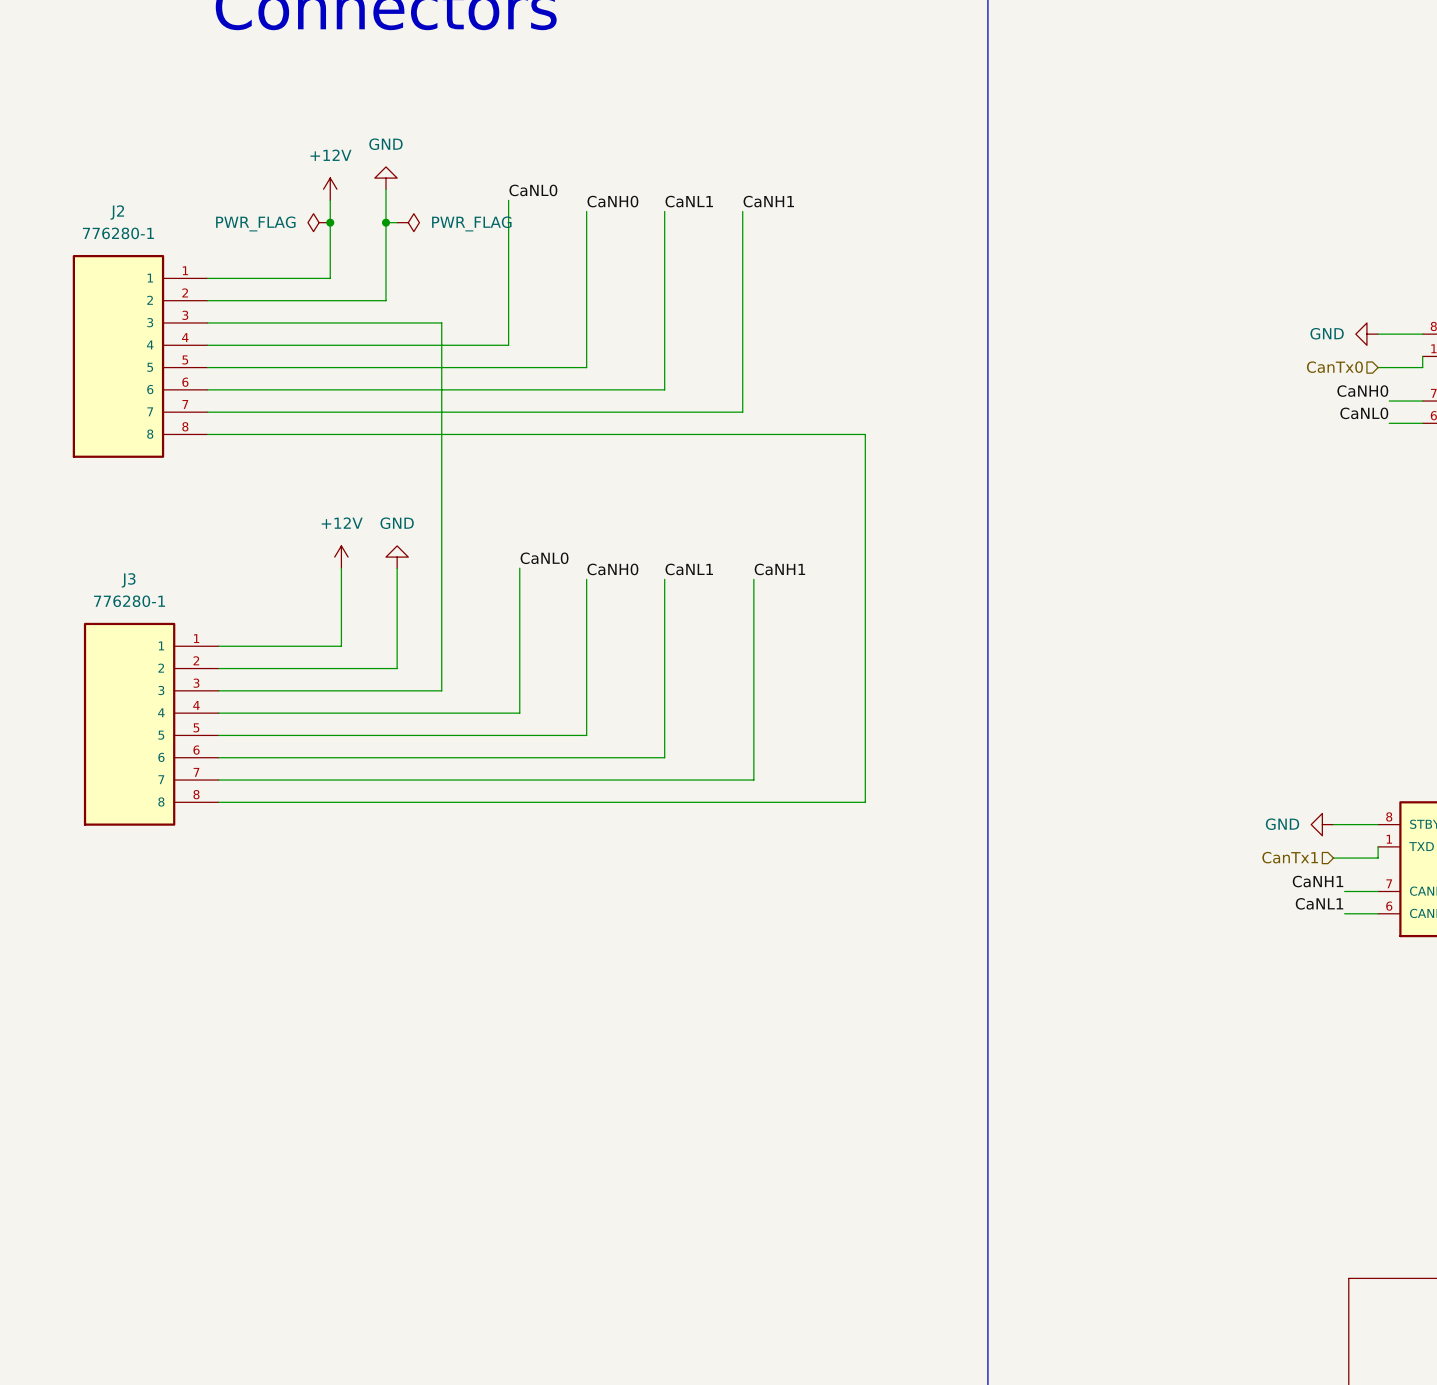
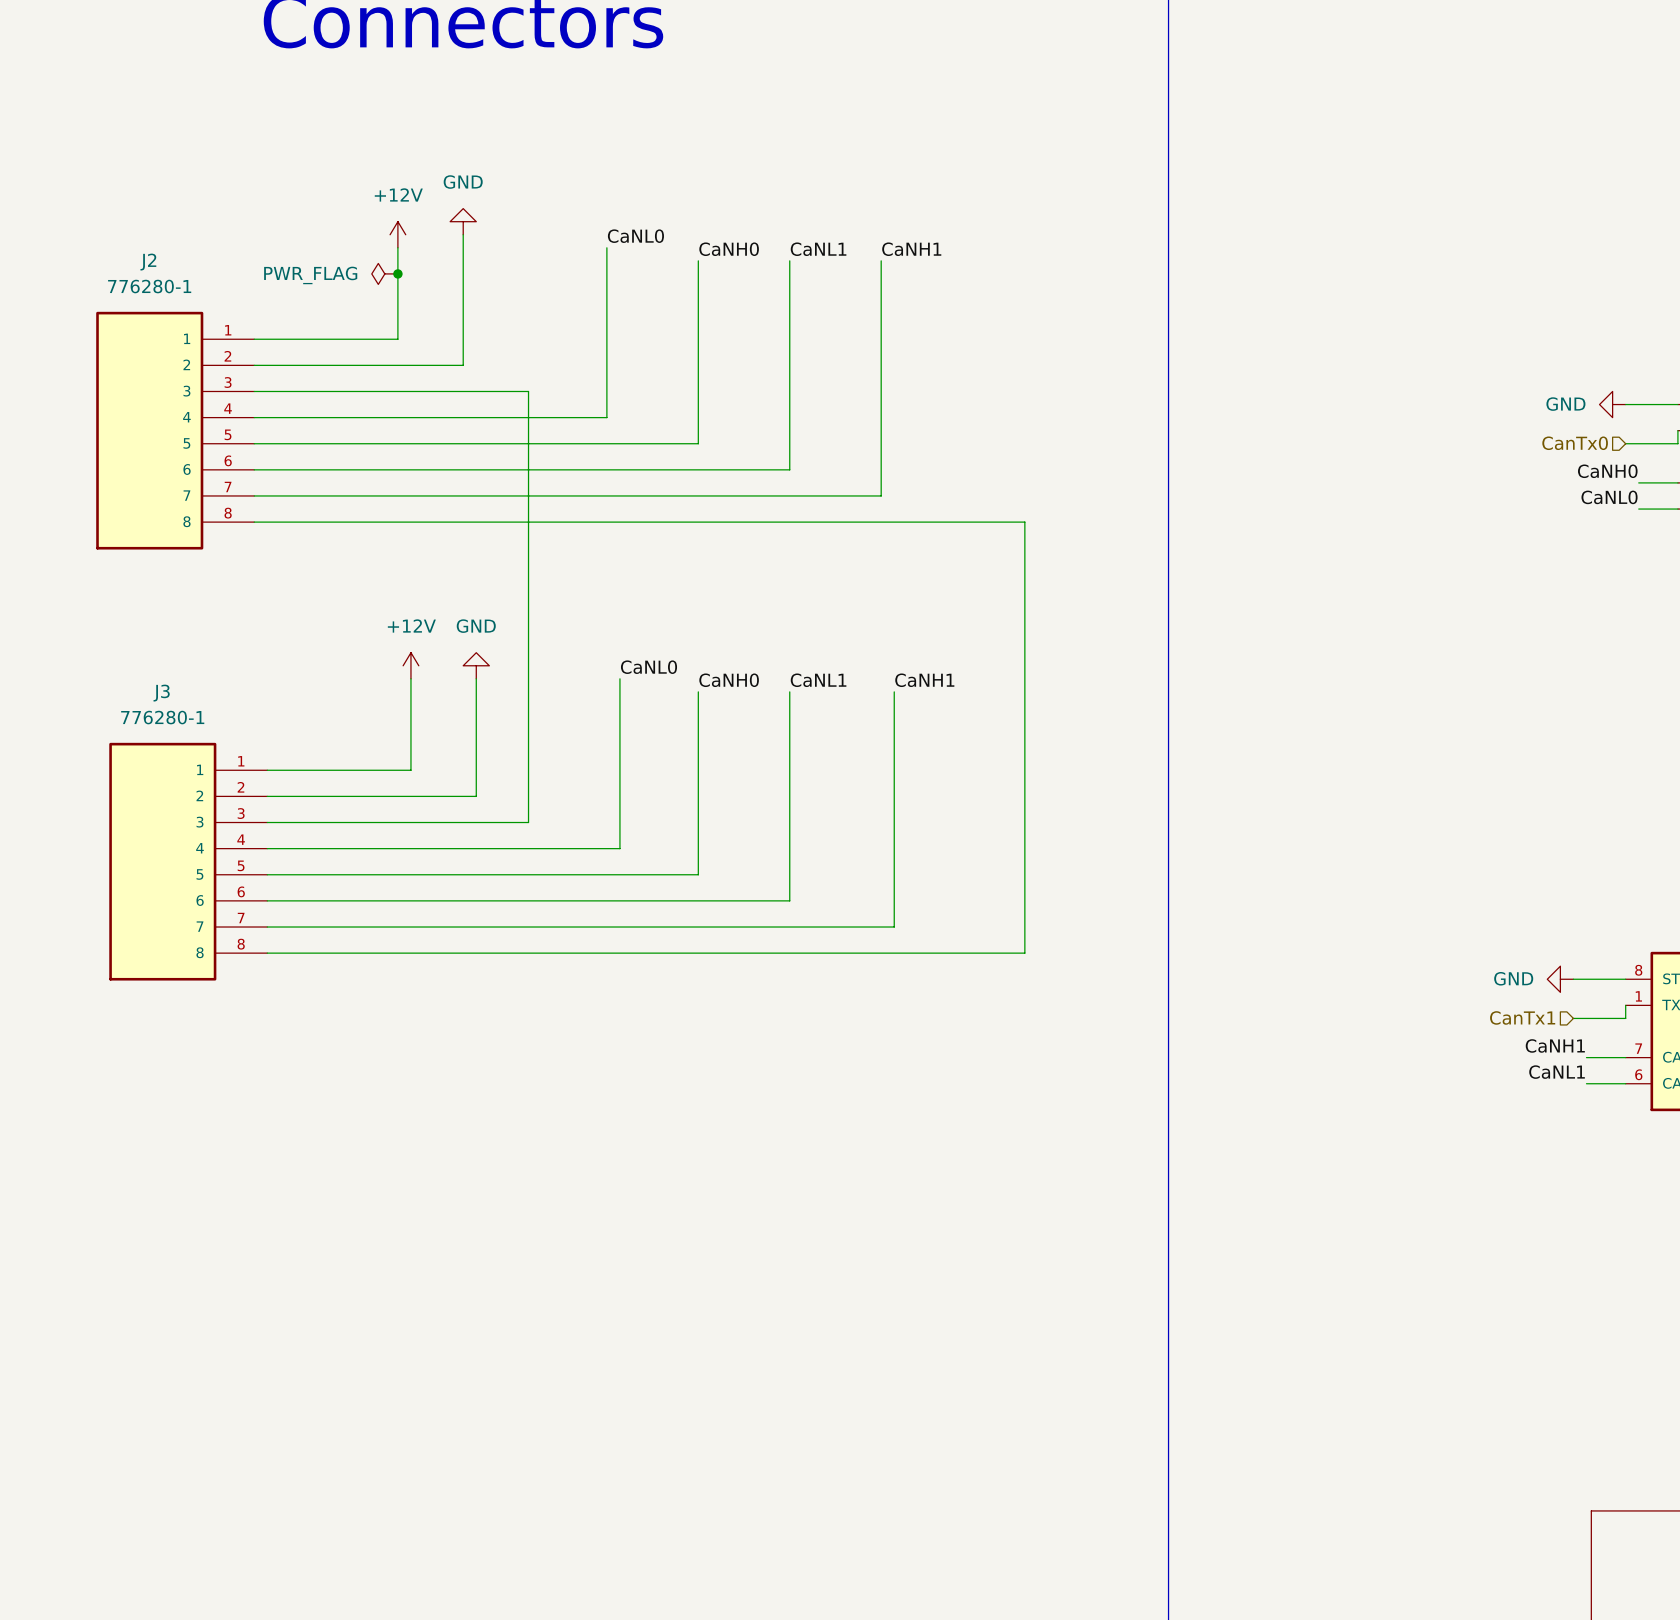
wire: (386, 222) (397, 222) -> none
junction: (386, 222) -> none
power symbol: PWR_FLAG (408, 222) -> none

